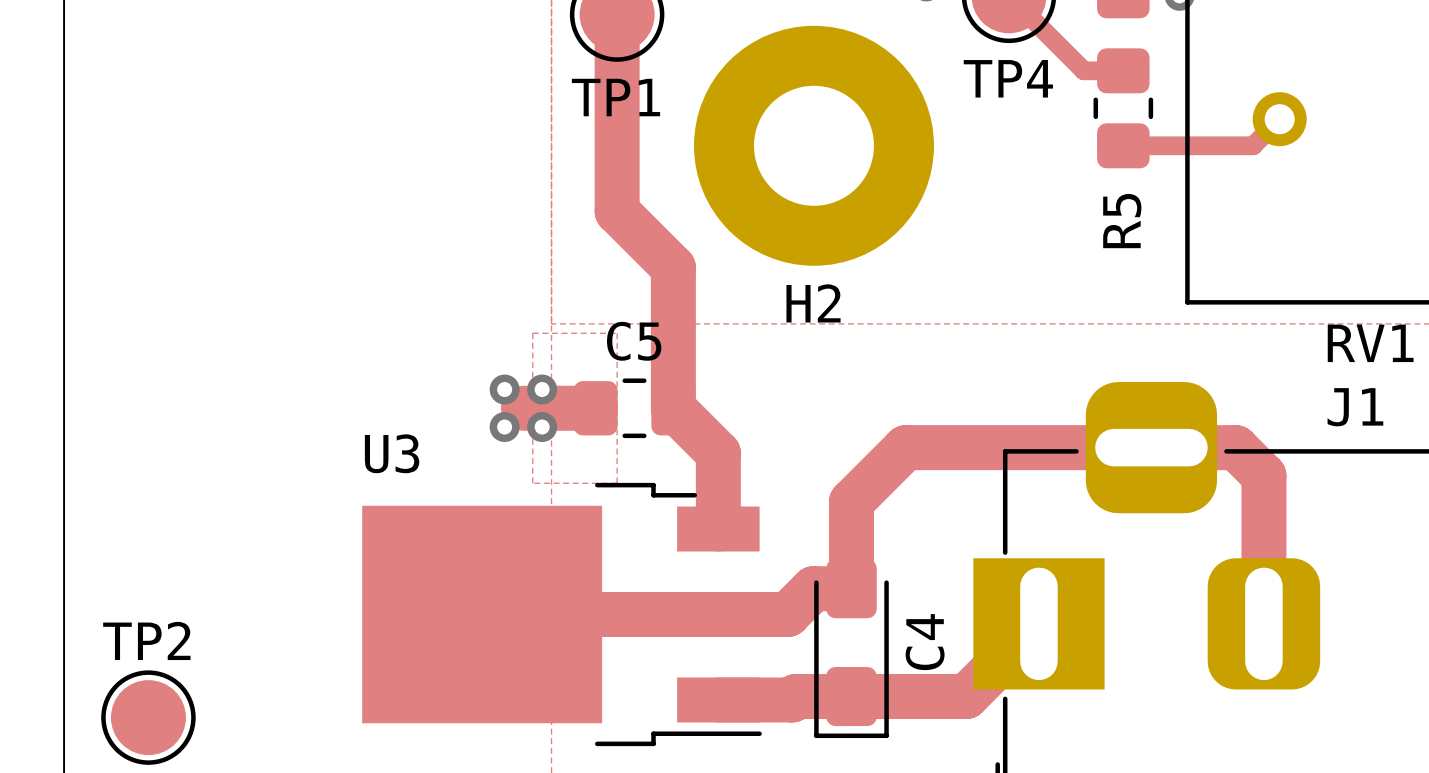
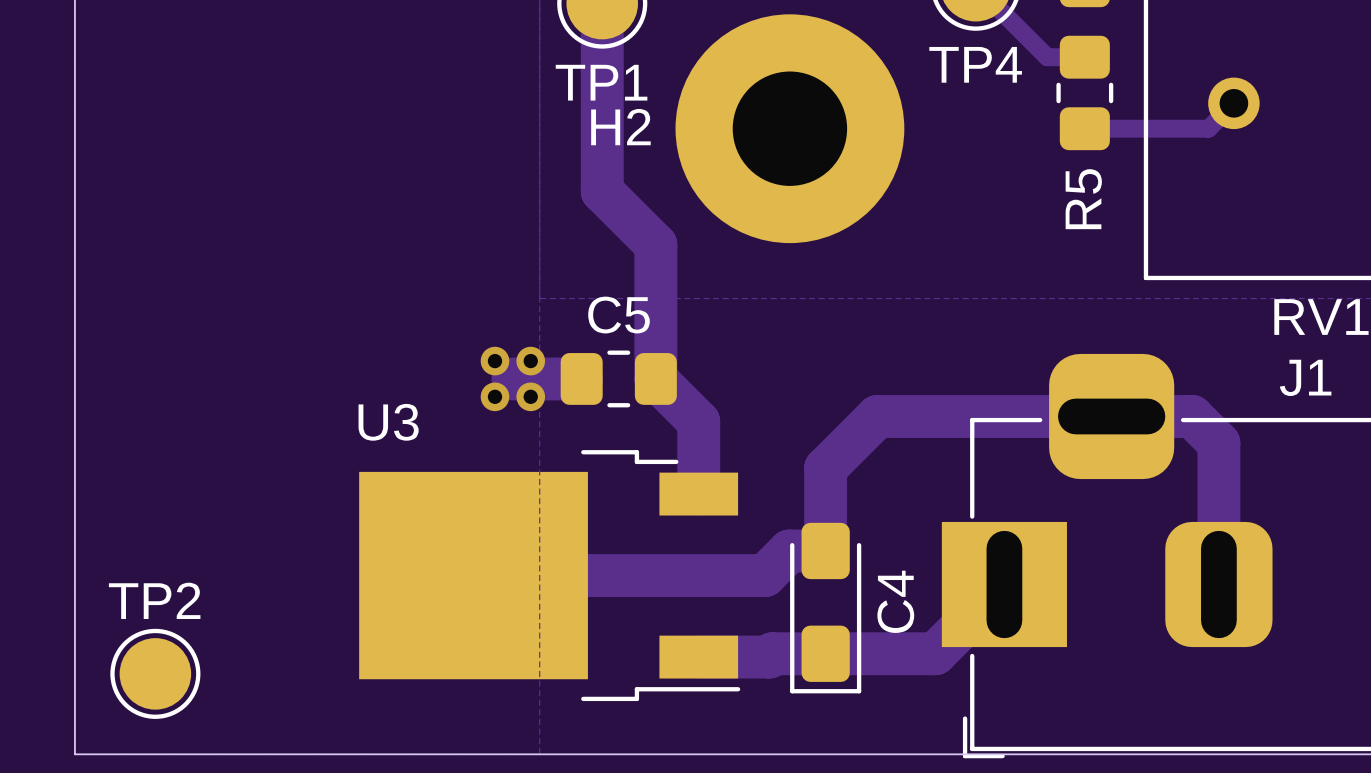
H2 name position: H2 (813, 303) -> H2 (620, 127)
zone outline: (532, 333) (532, 483) (617, 483) (617, 333) (532, 333) -> none

